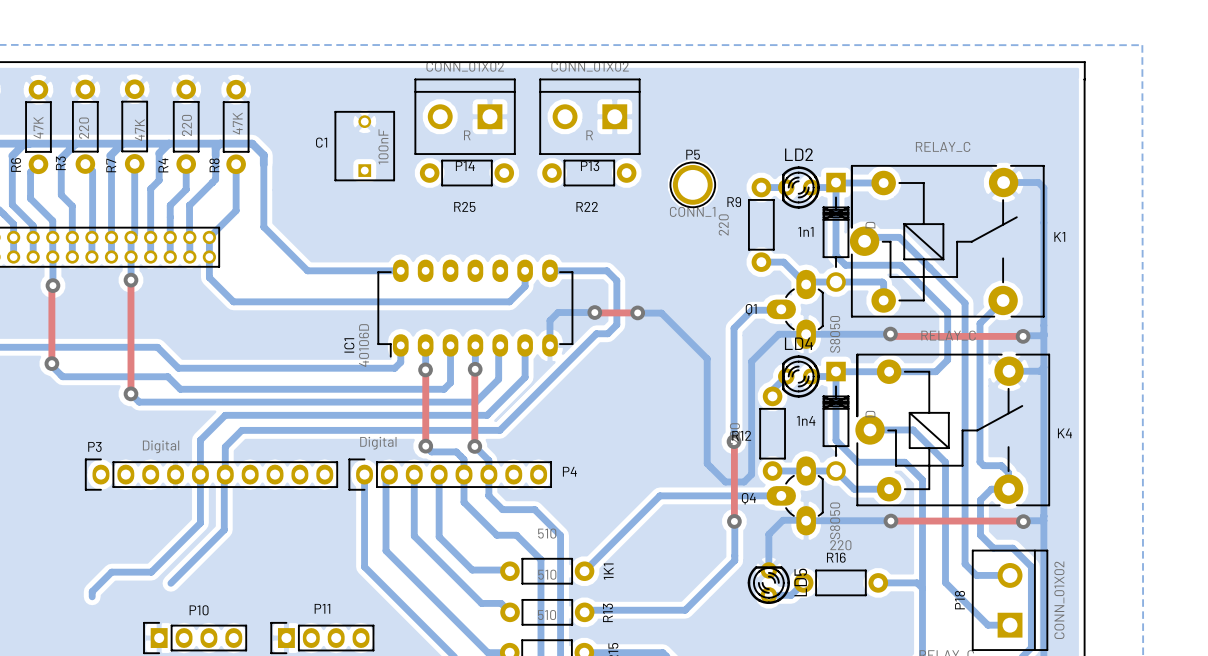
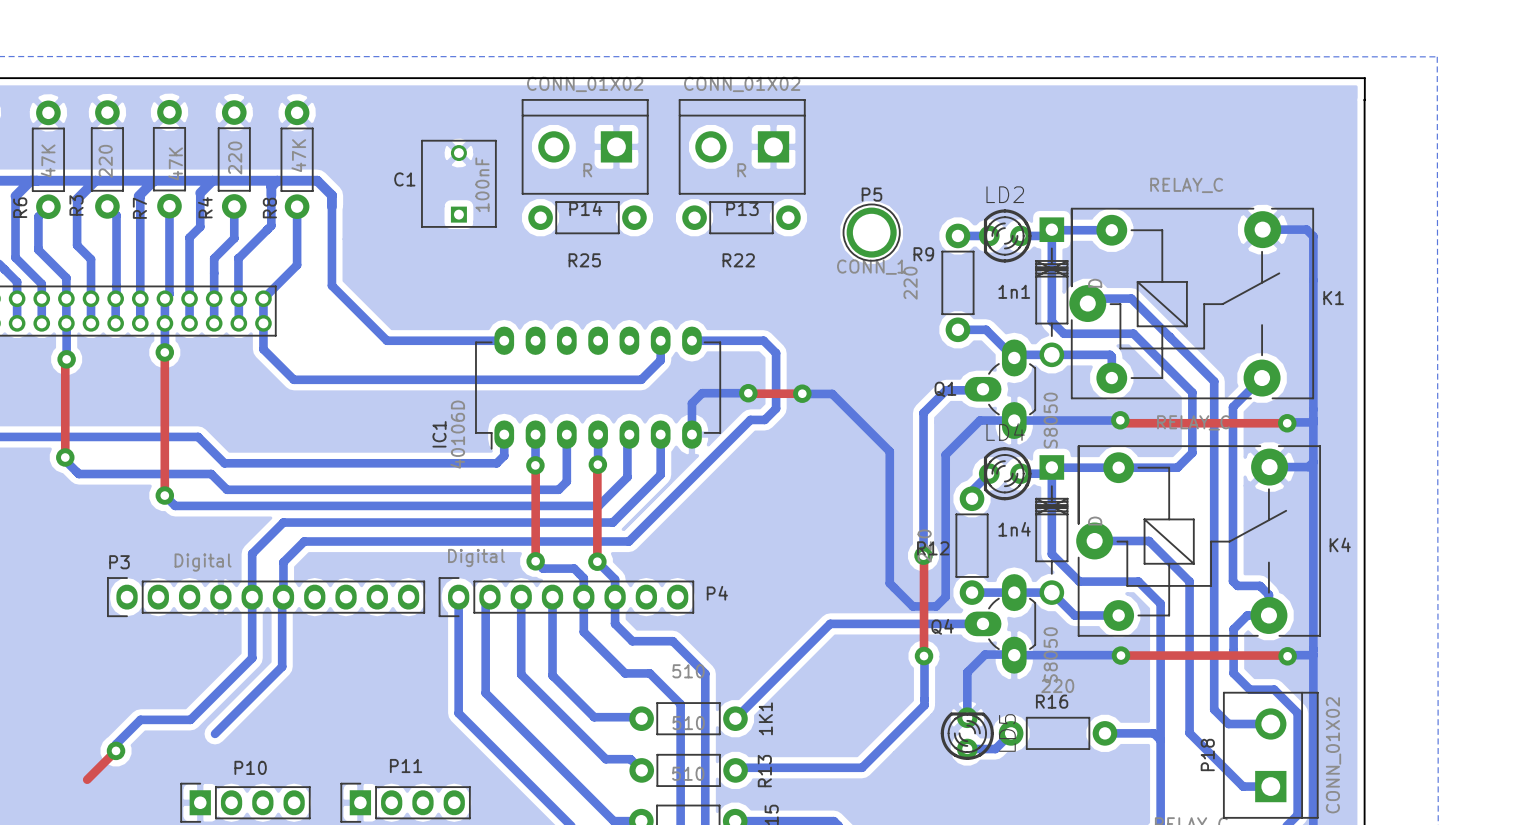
top track: none -> (116, 750) (87, 779)
via: none -> (116, 750)

